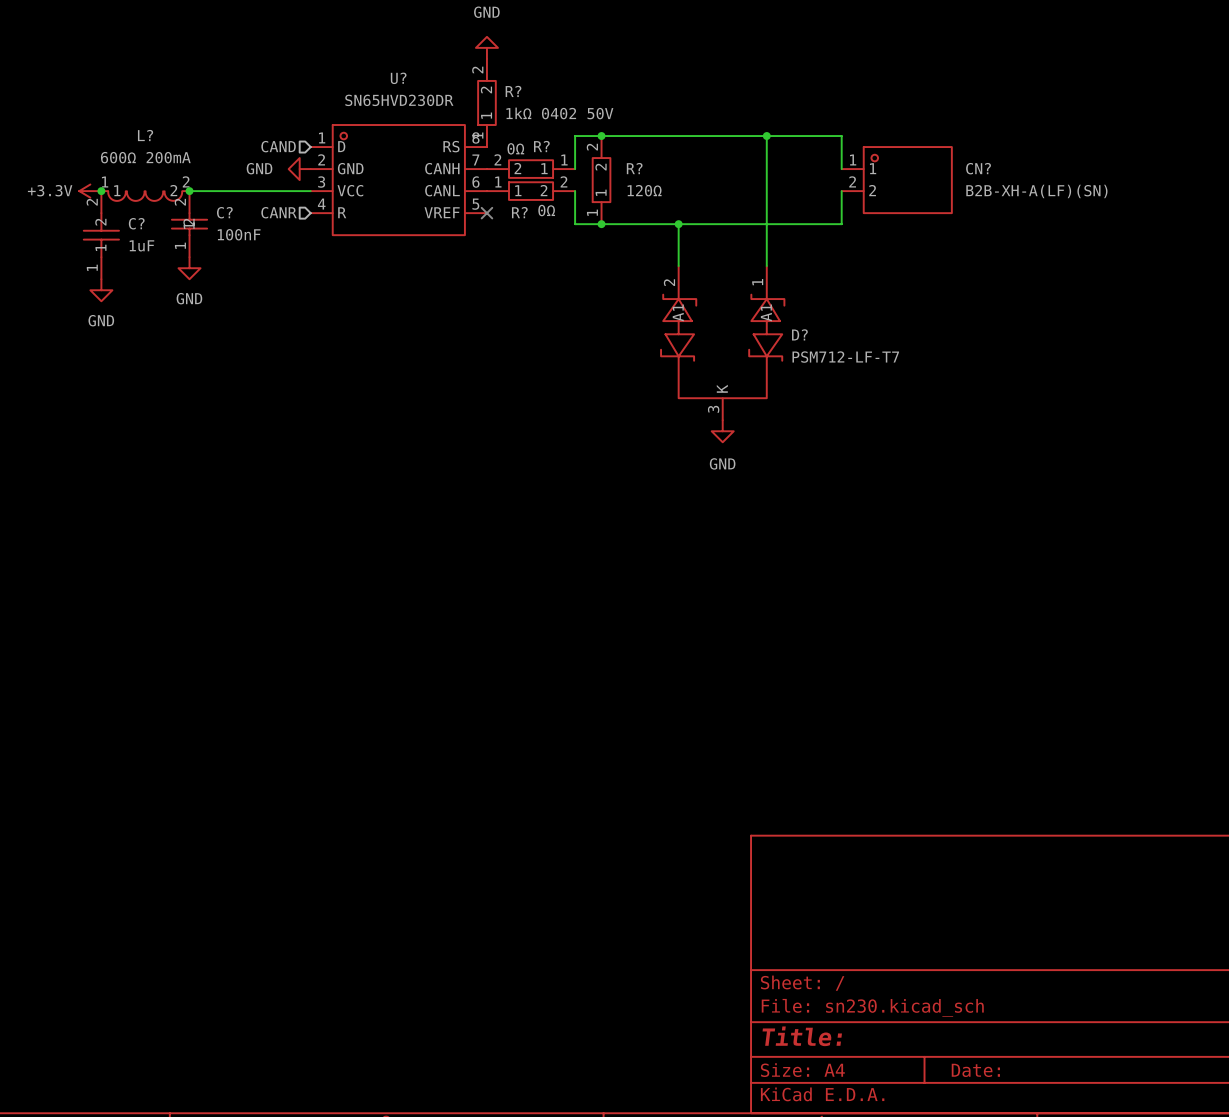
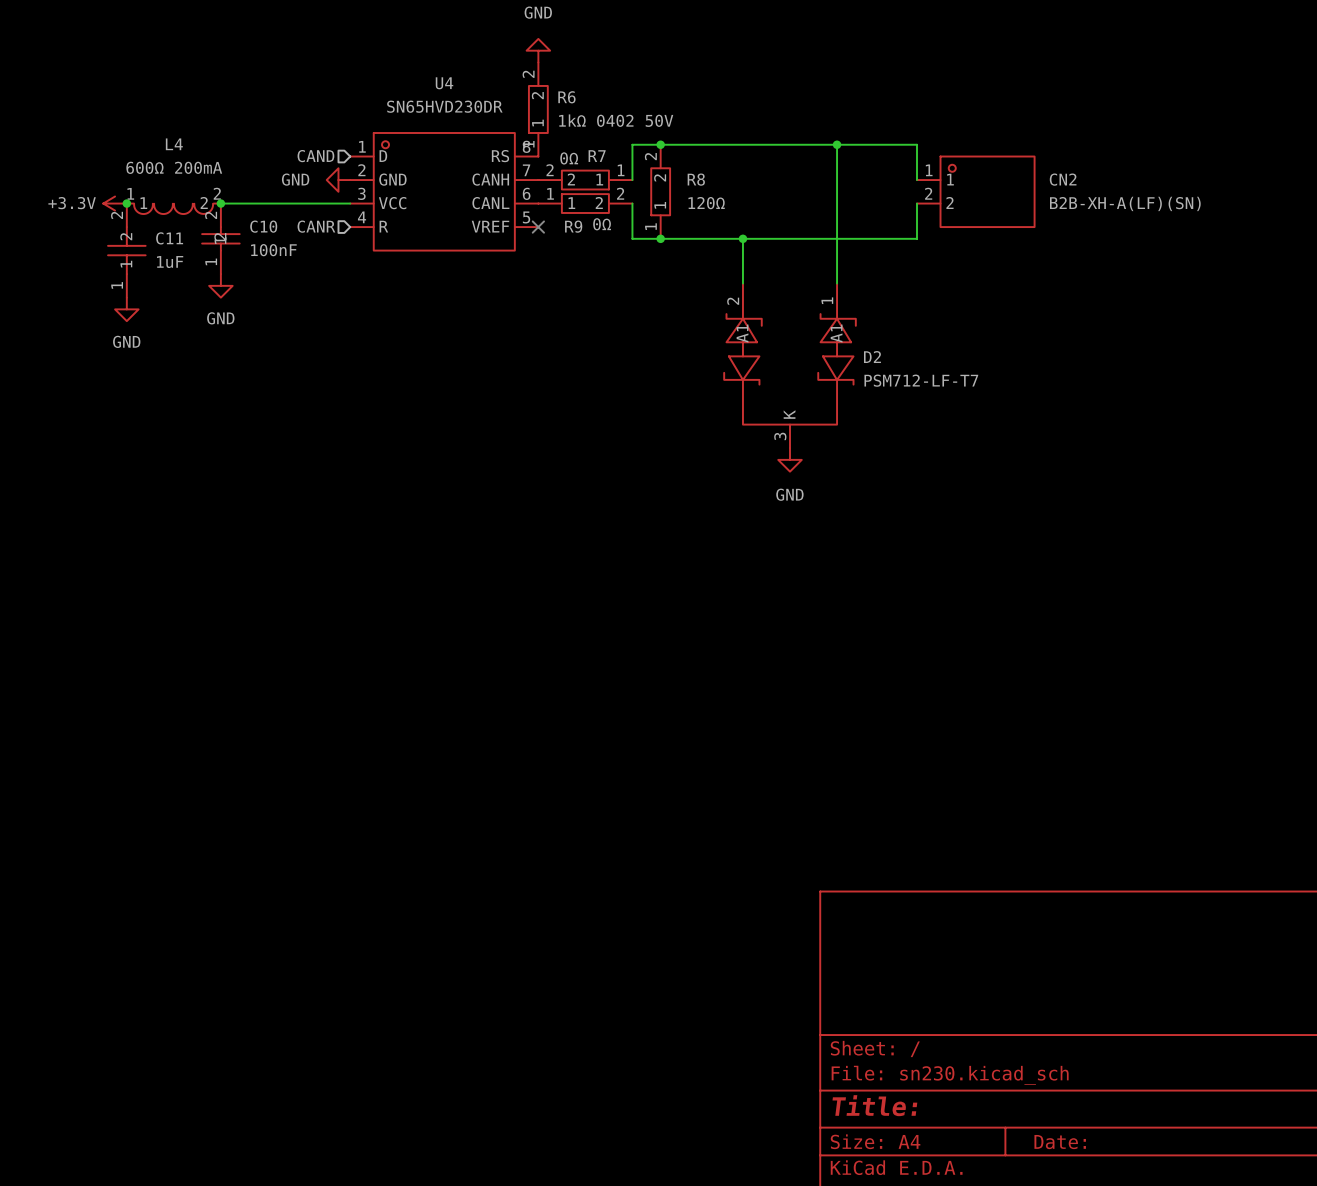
U? name: U? (398, 78) -> U4 (444, 83)
R? name: R? (513, 91) -> R6 (566, 97)
L? name: L? (145, 135) -> L4 (174, 144)
R? name: R? (541, 146) -> R7 (597, 156)
R? name: R? (634, 168) -> R8 (696, 179)
CN? name: CN? (978, 168) -> CN2 (1063, 179)
C? name: C? (224, 212) -> C10 (263, 226)
R? name: R? (519, 212) -> R9 (573, 226)
C? name: C? (136, 223) -> C11 (169, 238)
D? name: D? (799, 334) -> D2 (872, 357)

